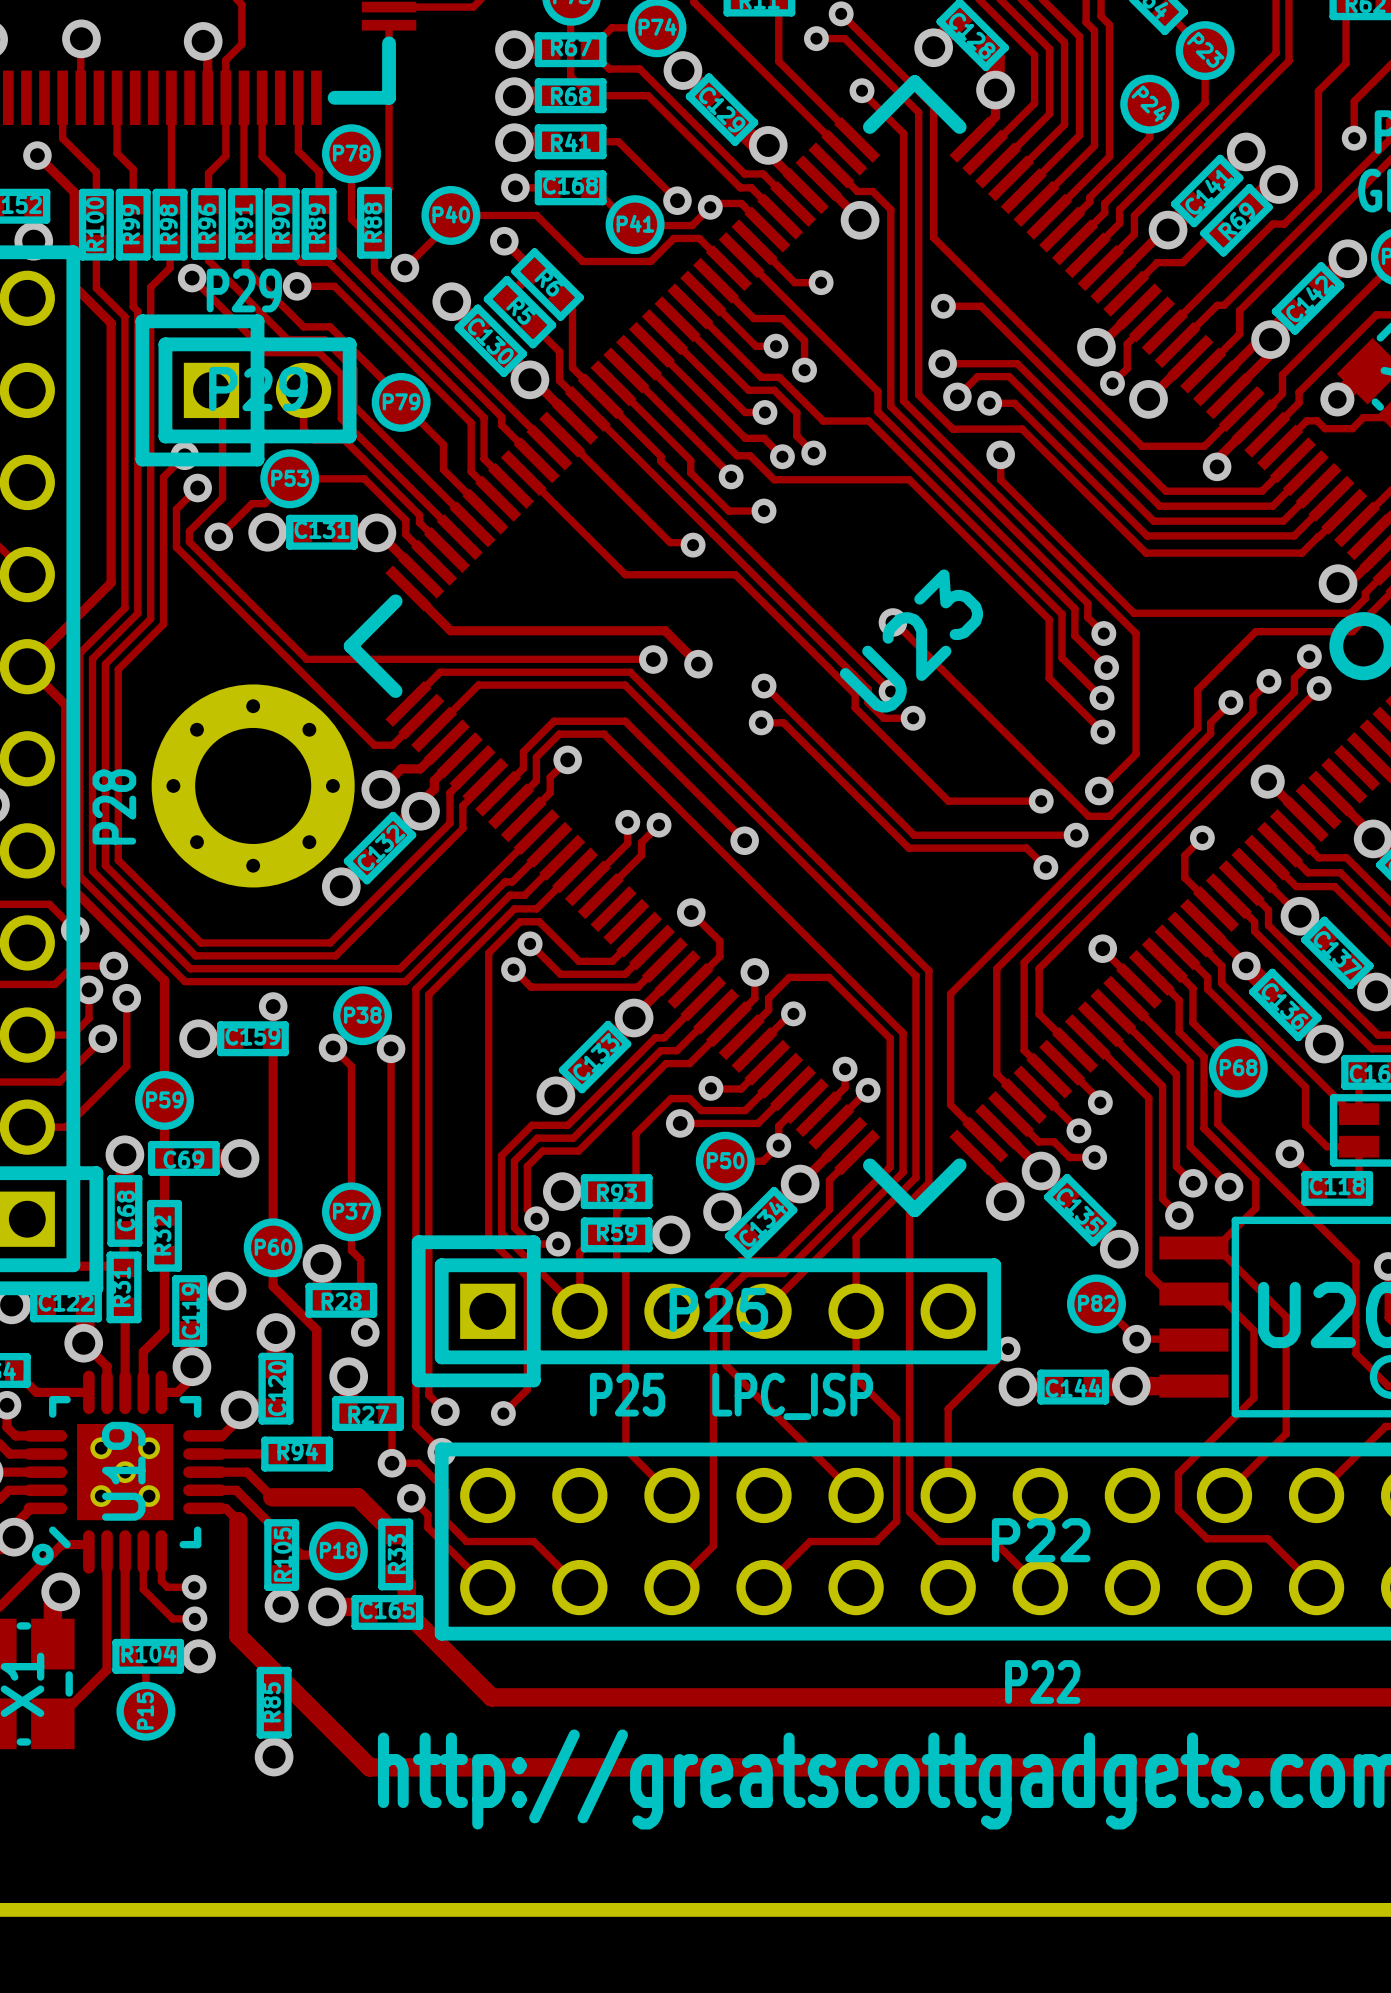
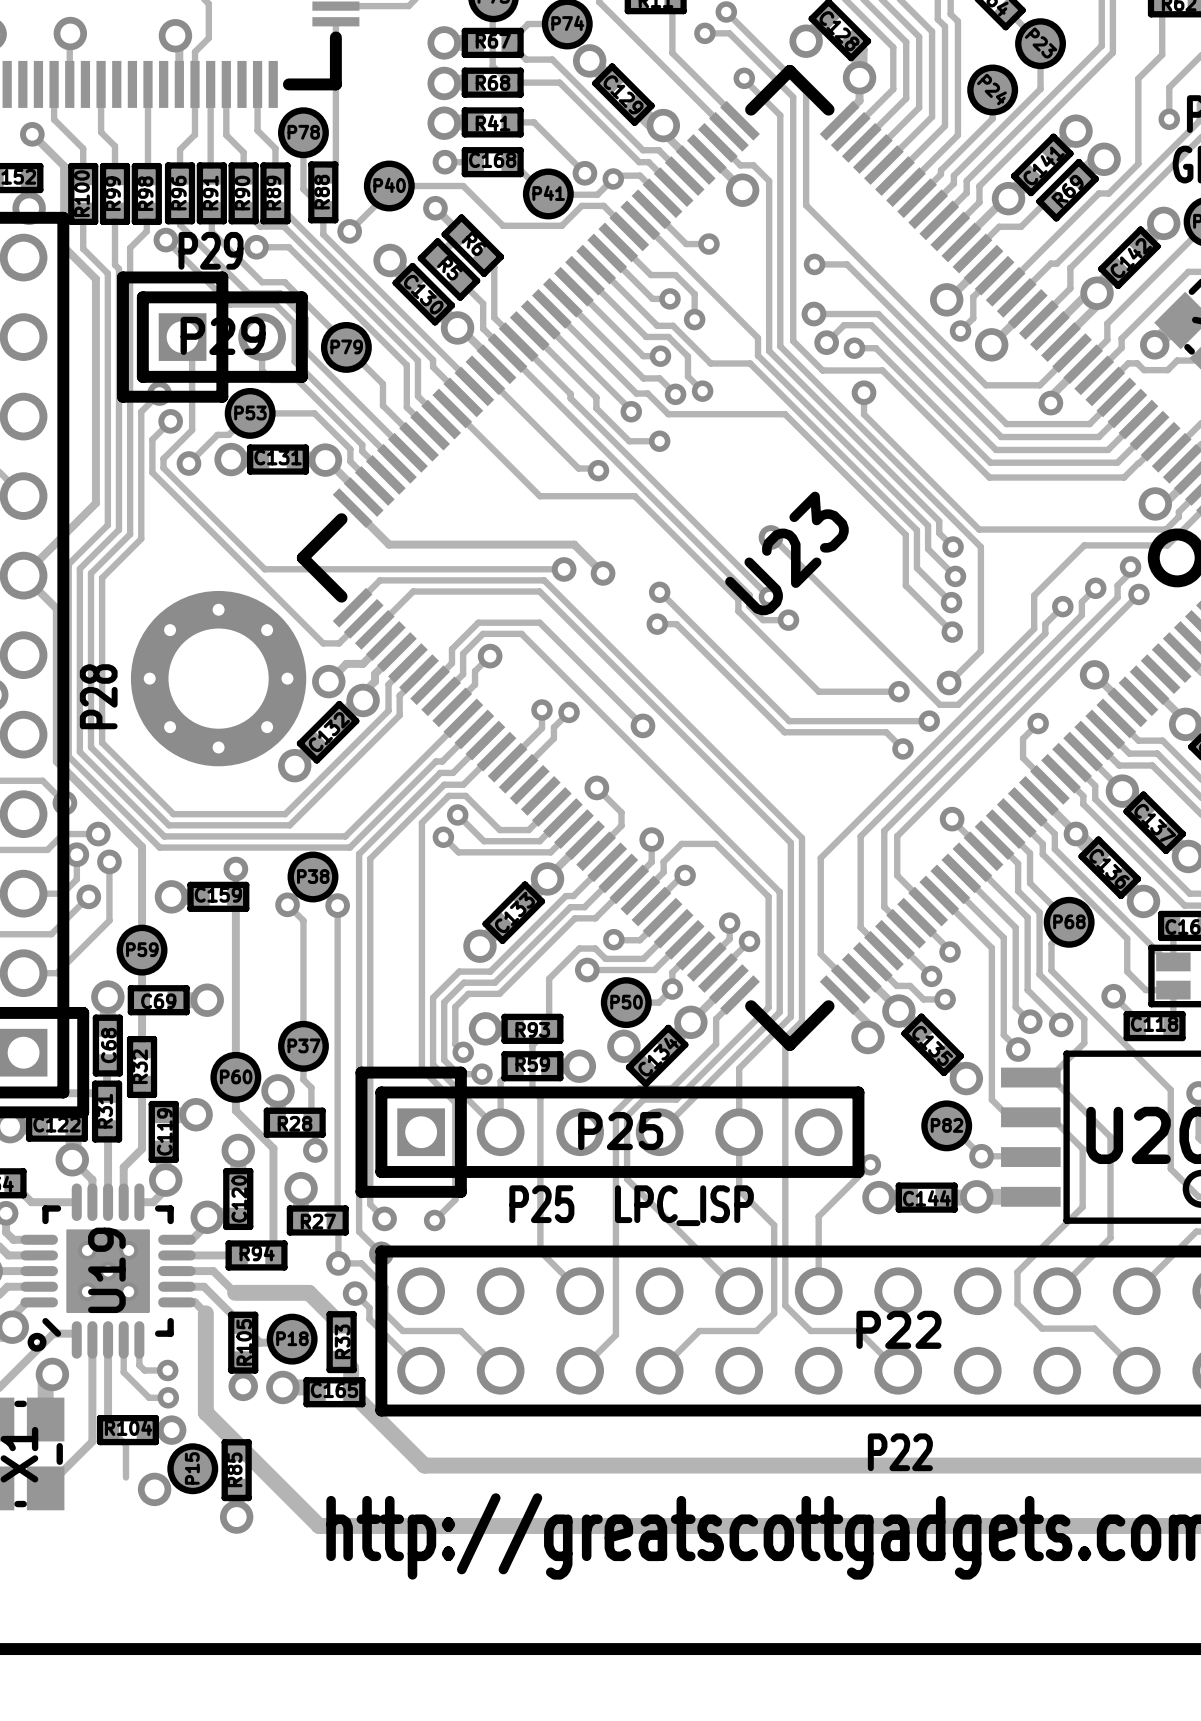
P15 position: (145, 1711) -> (192, 1468)
via: none -> (154, 1489)

